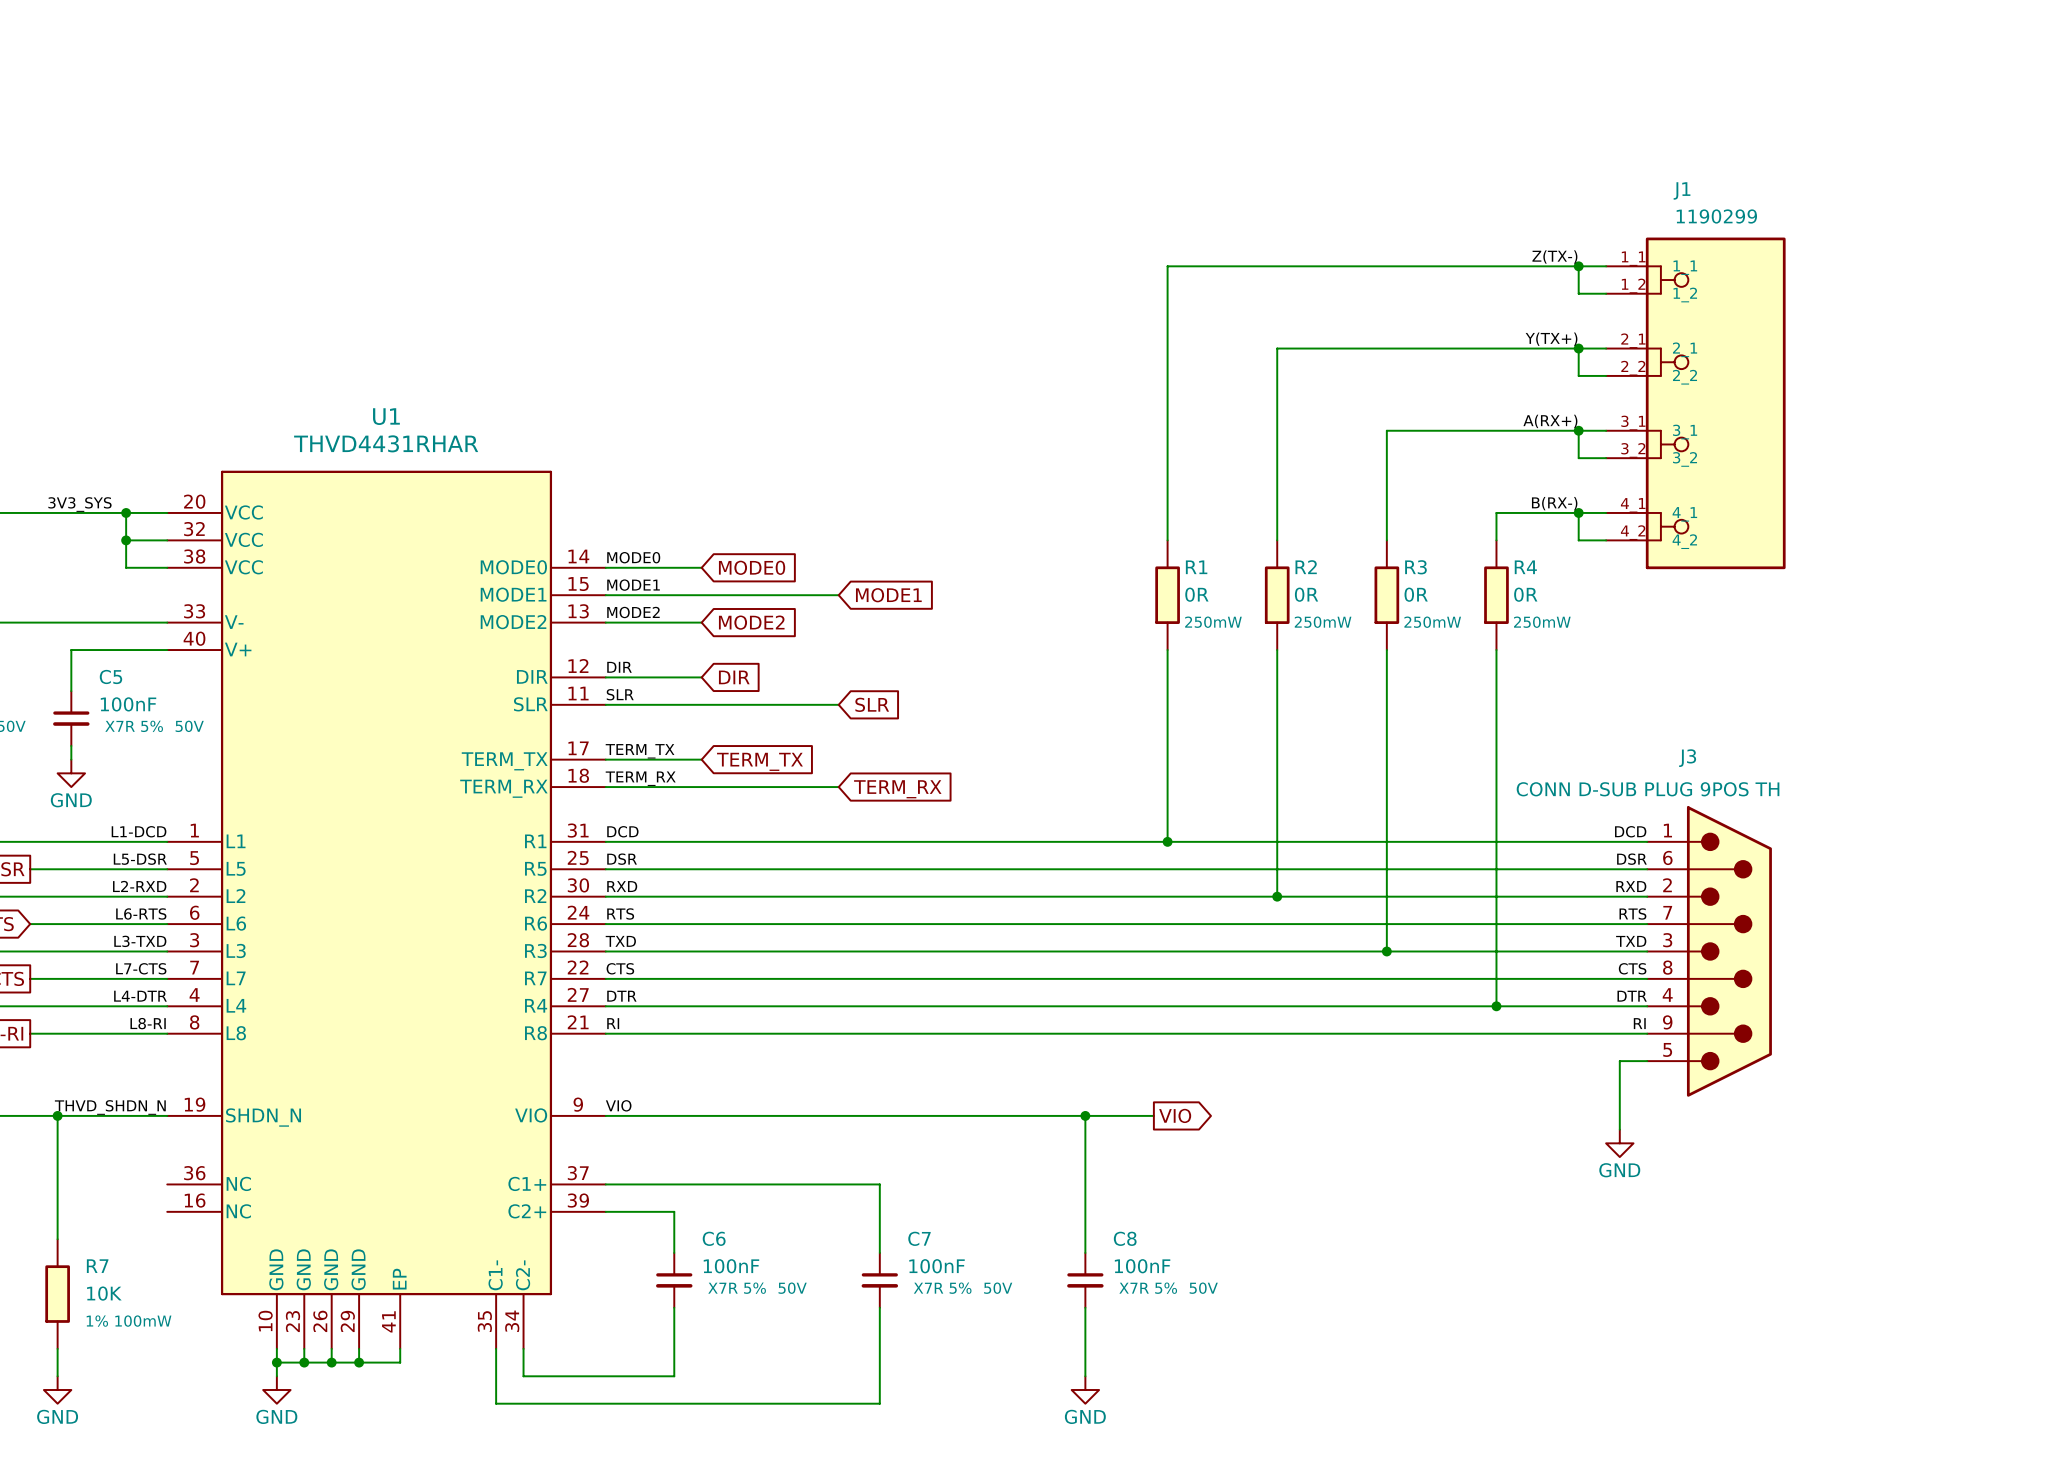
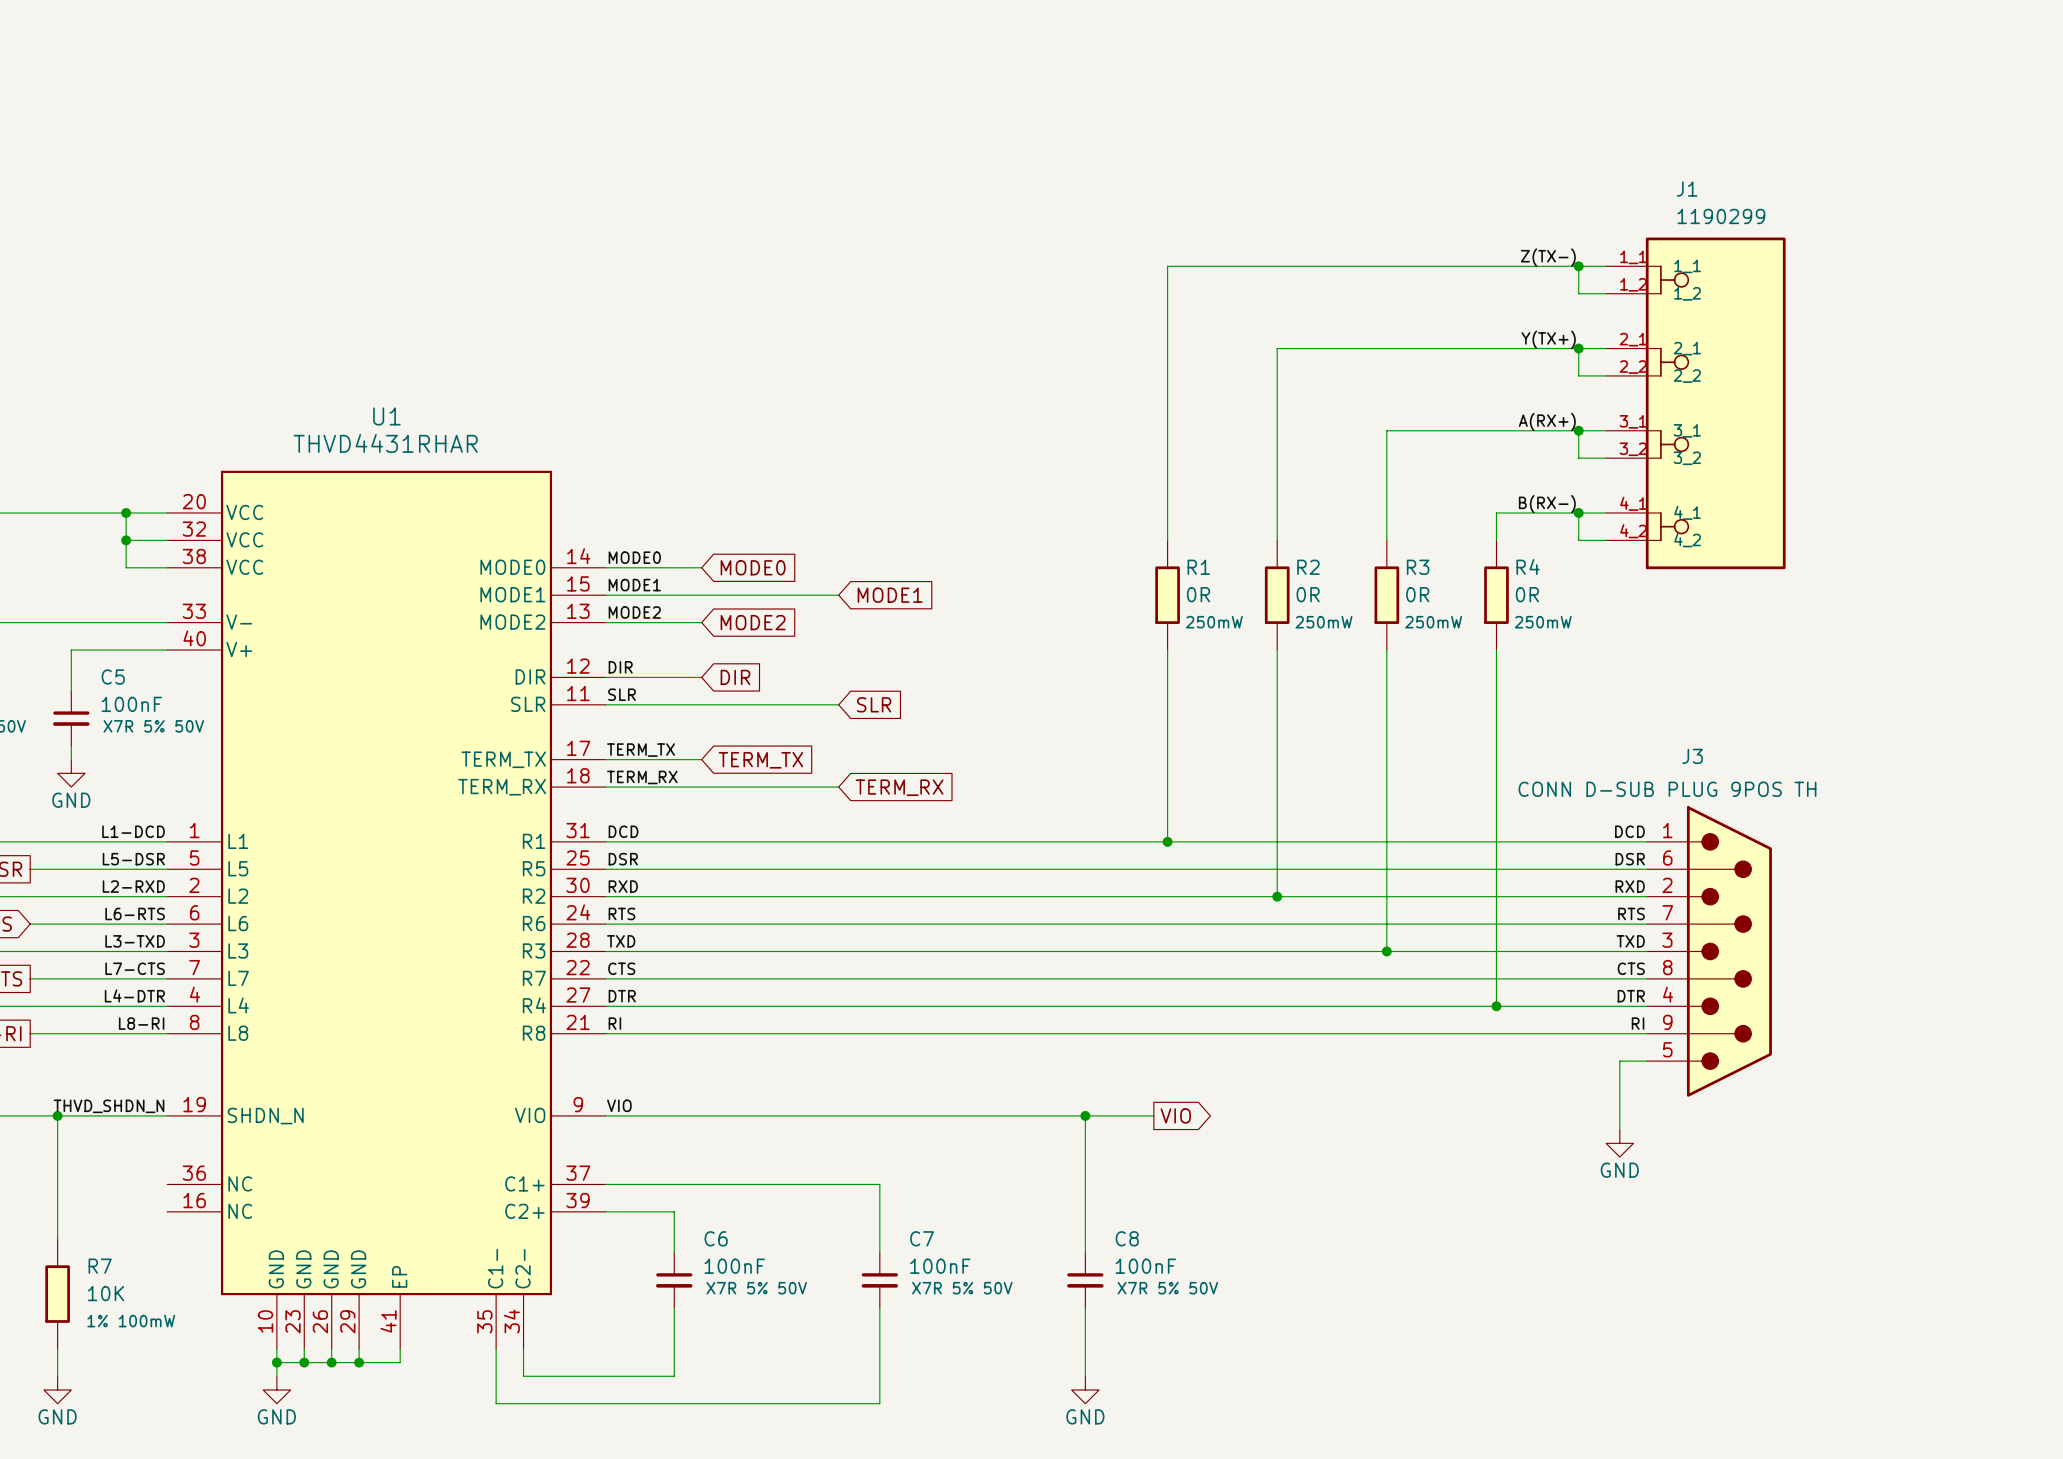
label: 3V3_SYS (79, 504) -> none

